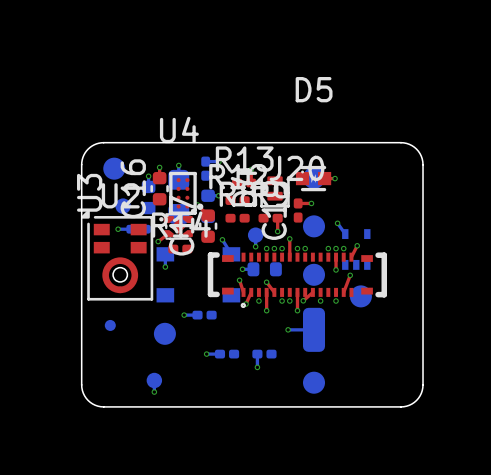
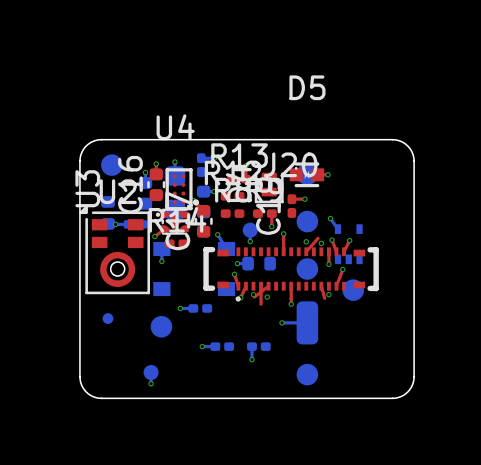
part footprint: [115, 198, 131, 214] -> [101, 196, 115, 230]
top track: none -> (318, 238) (306, 251)
top track: none -> (332, 240) (336, 251)
via: none -> (332, 240)
via: none -> (306, 241)
via: (266, 248) -> none
via: (274, 248) -> none
via: (282, 248) -> none
via: (297, 248) -> none
via: (305, 248) -> none
via: (336, 248) -> none
via: (343, 248) -> none
top track: (266, 282) (274, 292) -> (254, 297) (268, 286)
via: (266, 282) -> none
top track: (312, 292) (303, 300) -> none
top track: none -> (321, 286) (324, 298)
via: (303, 300) -> none
via: (282, 301) -> none
via: (289, 301) -> none
via: (320, 301) -> none
via: none -> (267, 297)
via: (266, 310) -> none

